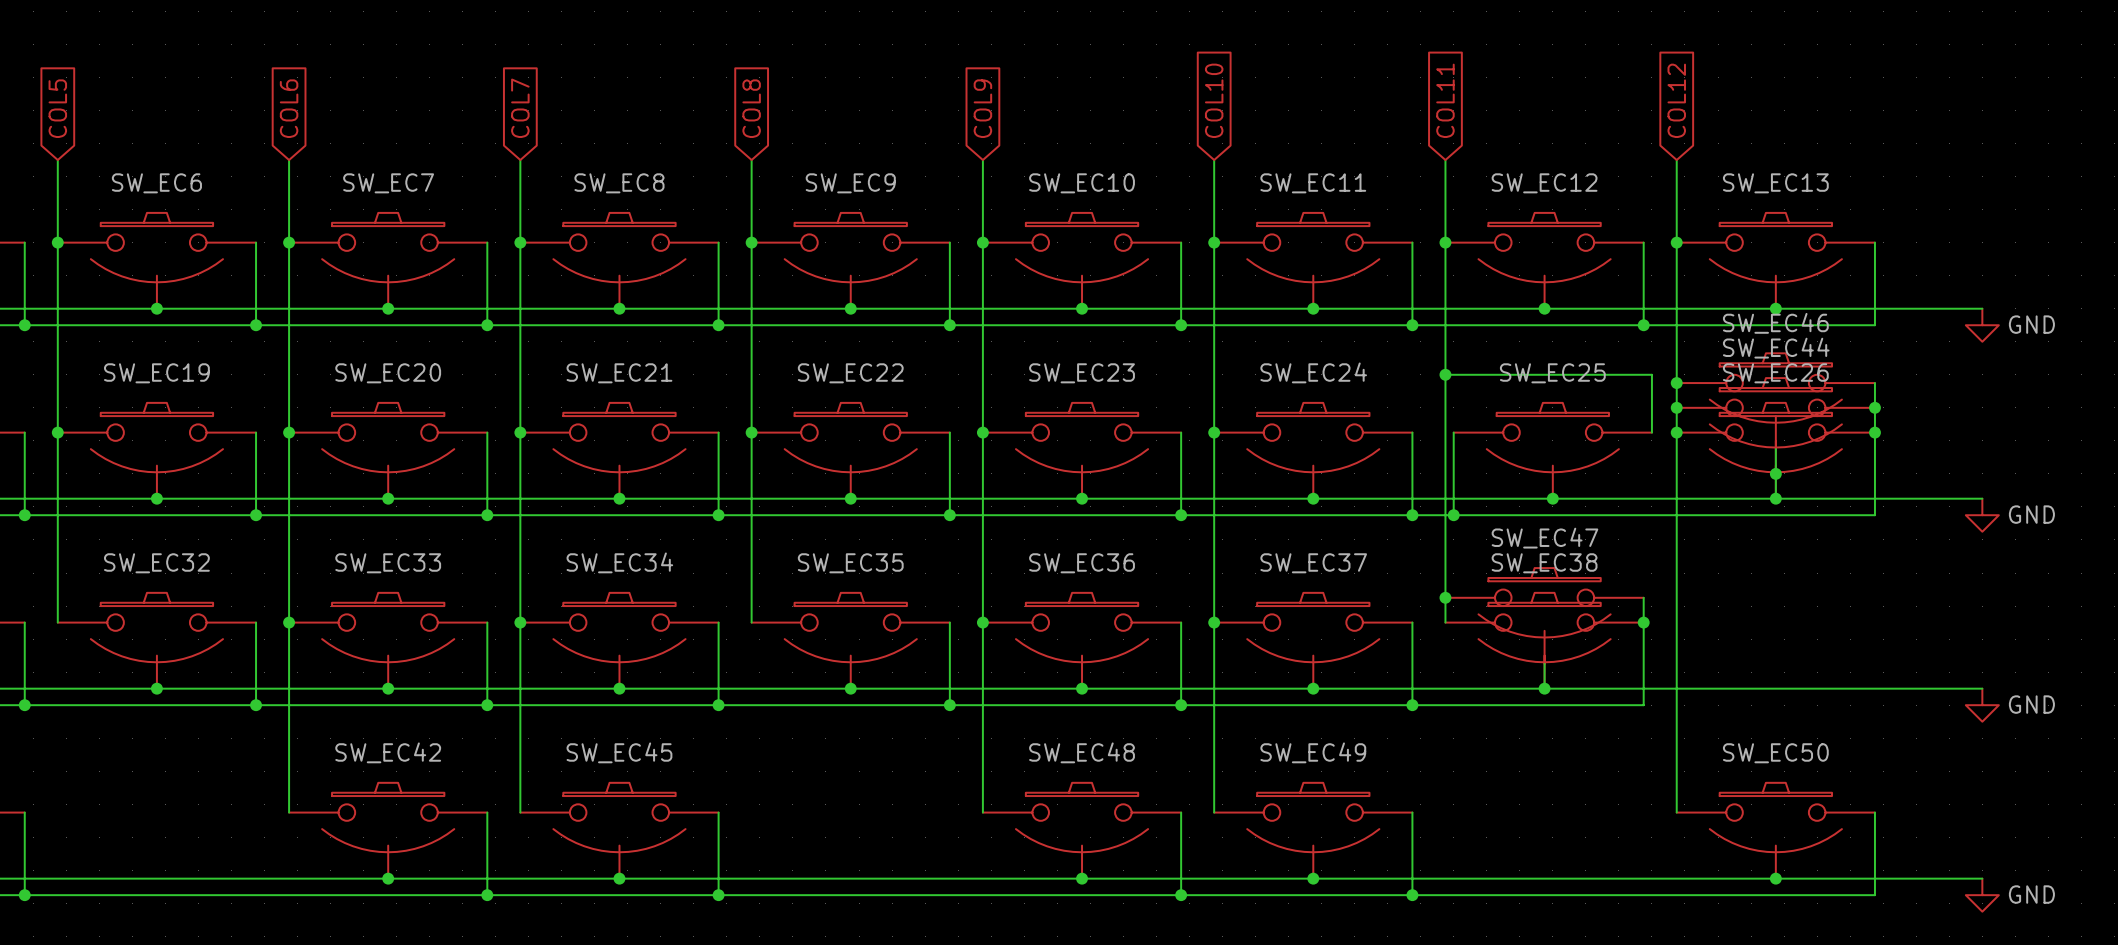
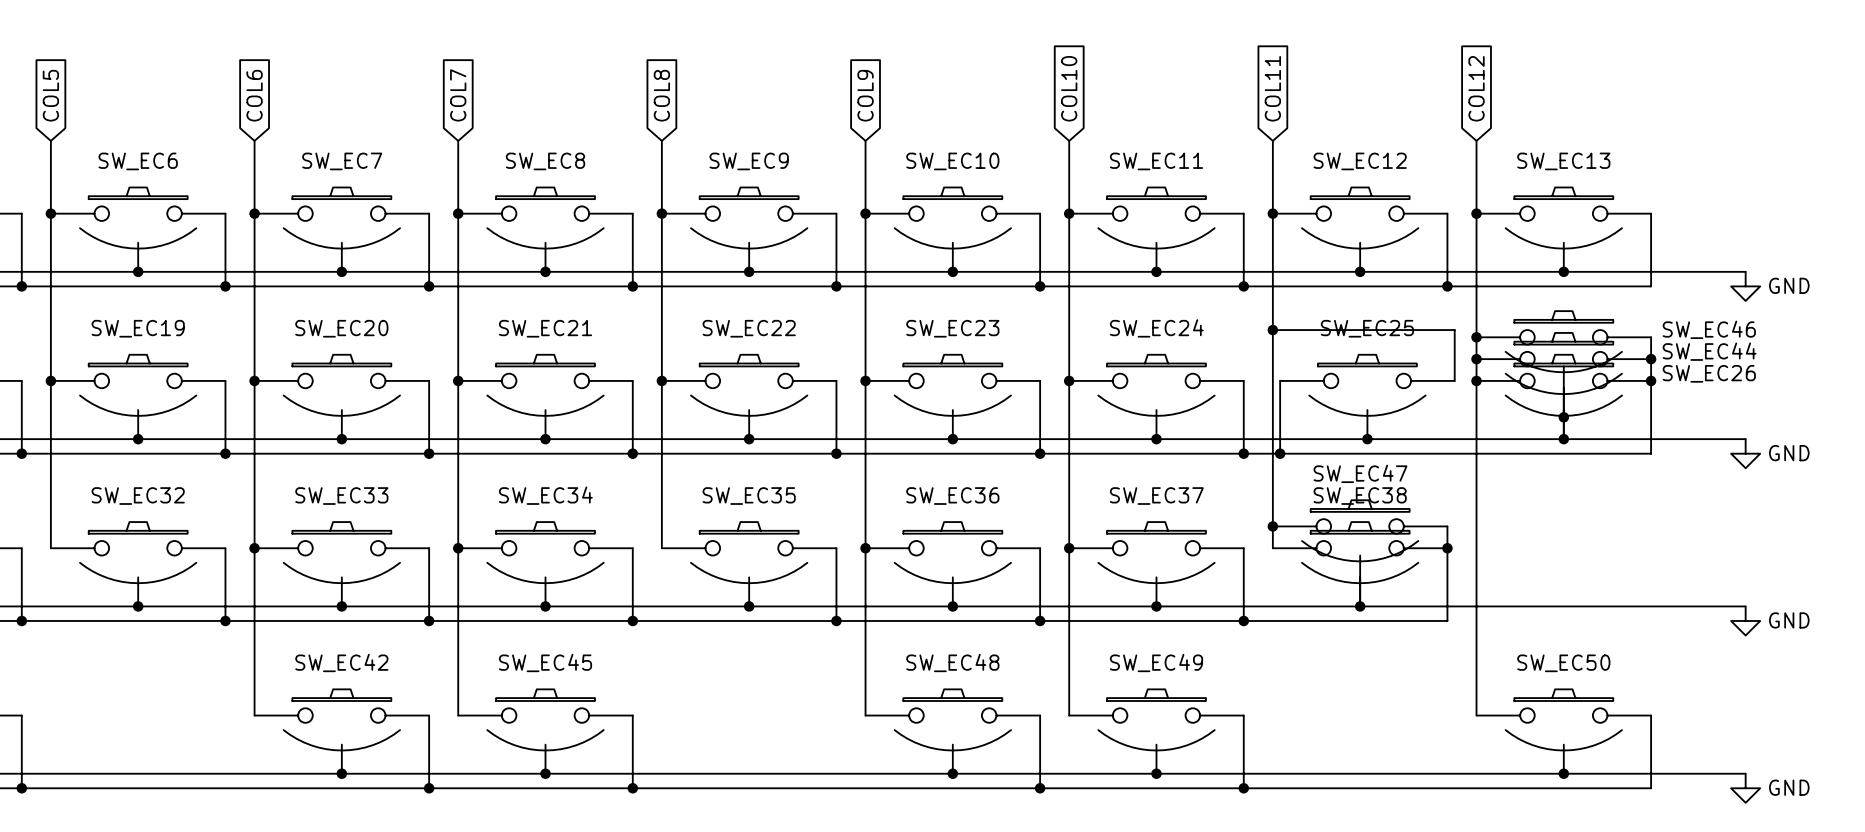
SW_EC46 name position: SW_EC46 (1775, 323) -> SW_EC46 (1709, 329)
SW_EC44 name position: SW_EC44 (1776, 348) -> SW_EC44 (1709, 351)
SW_EC26 name position: SW_EC26 (1775, 373) -> SW_EC26 (1709, 373)

